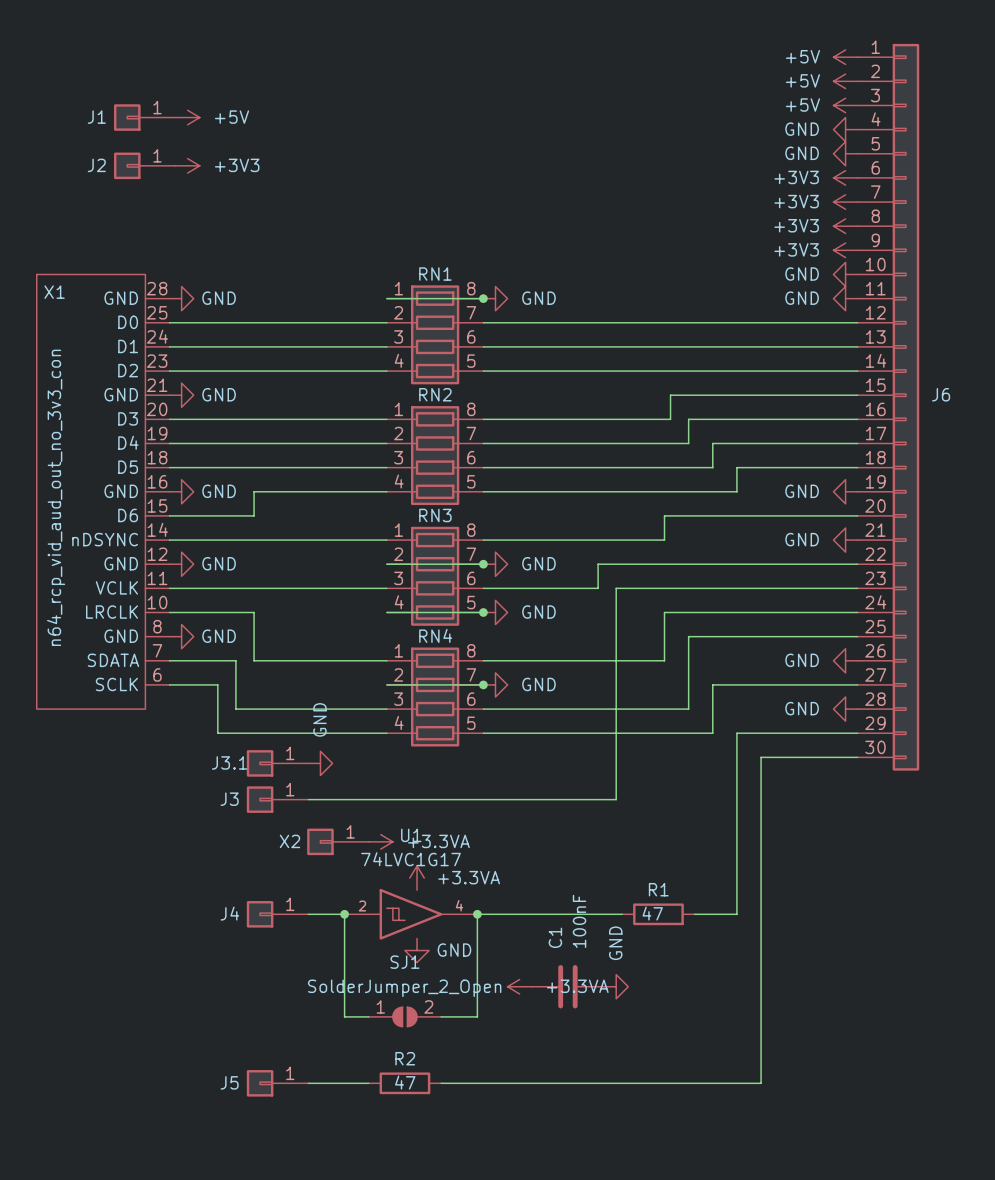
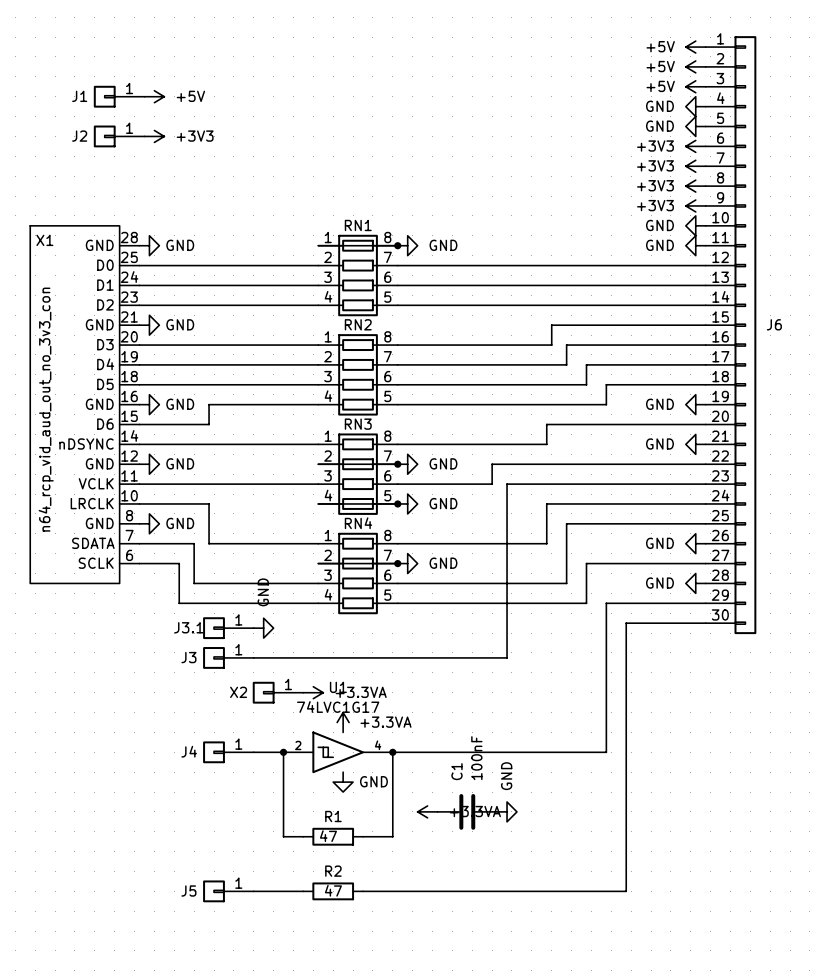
wire: none -> (511, 752) (571, 752)
R1 position: (658, 914) -> (333, 836)
SJ1: SolderJumper_2_Open (404, 1016) -> none

